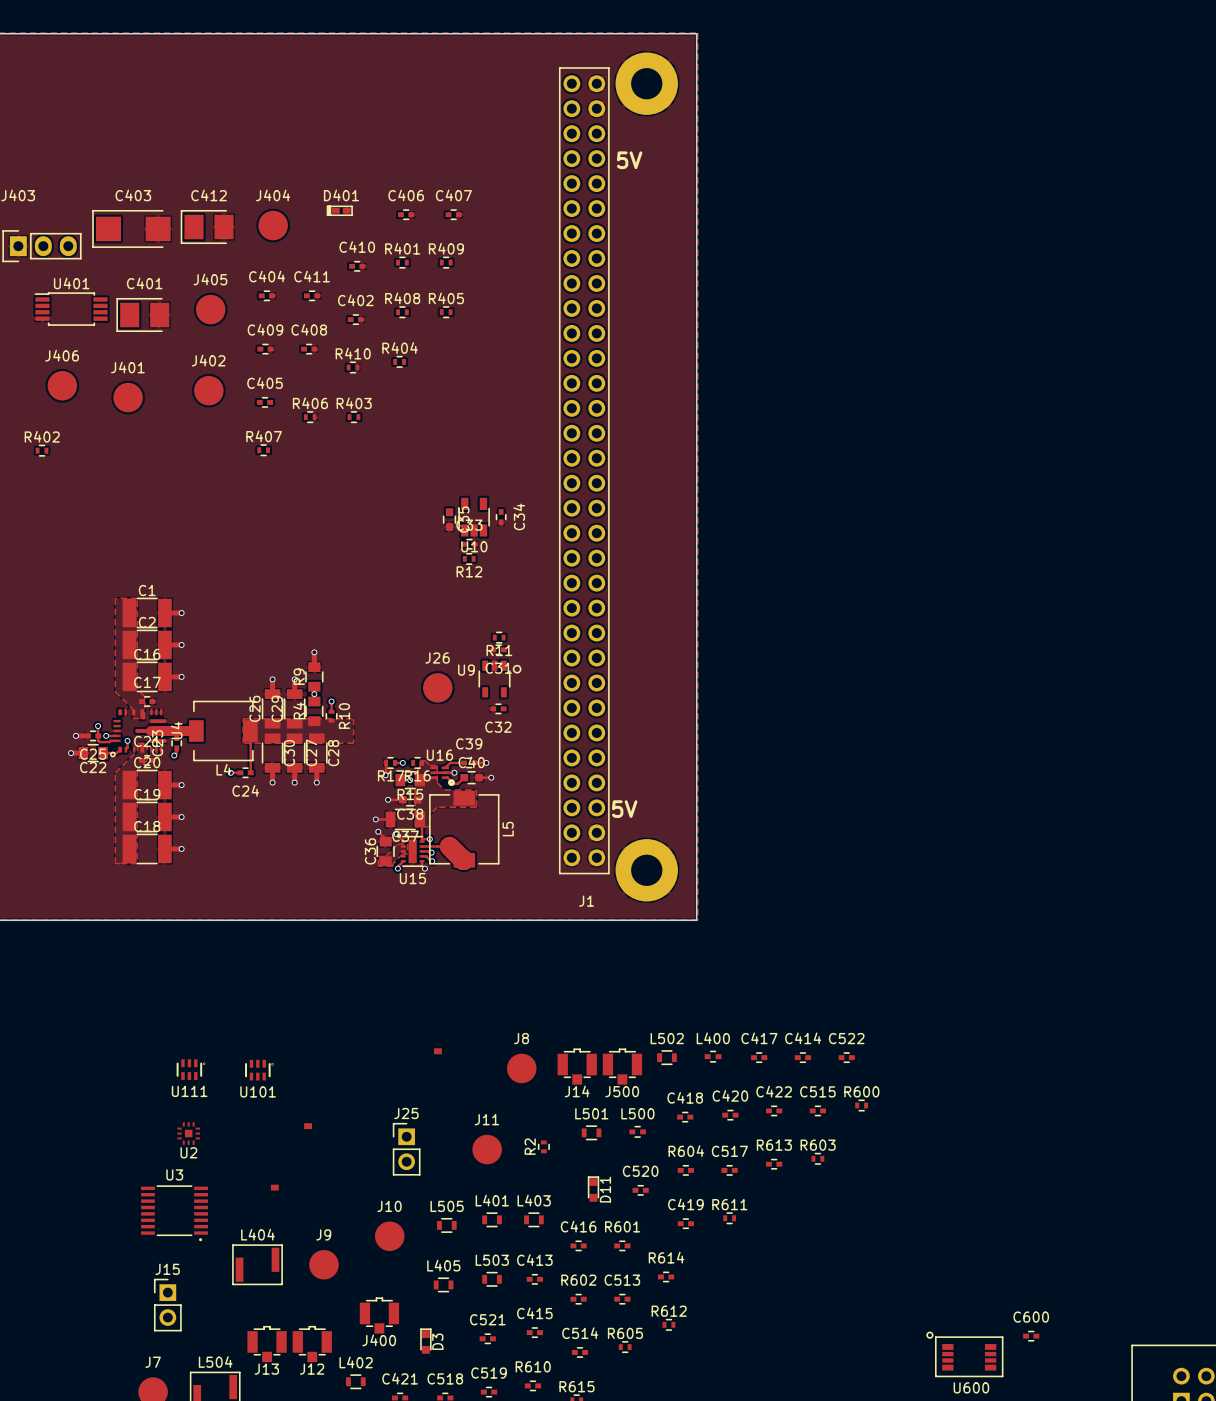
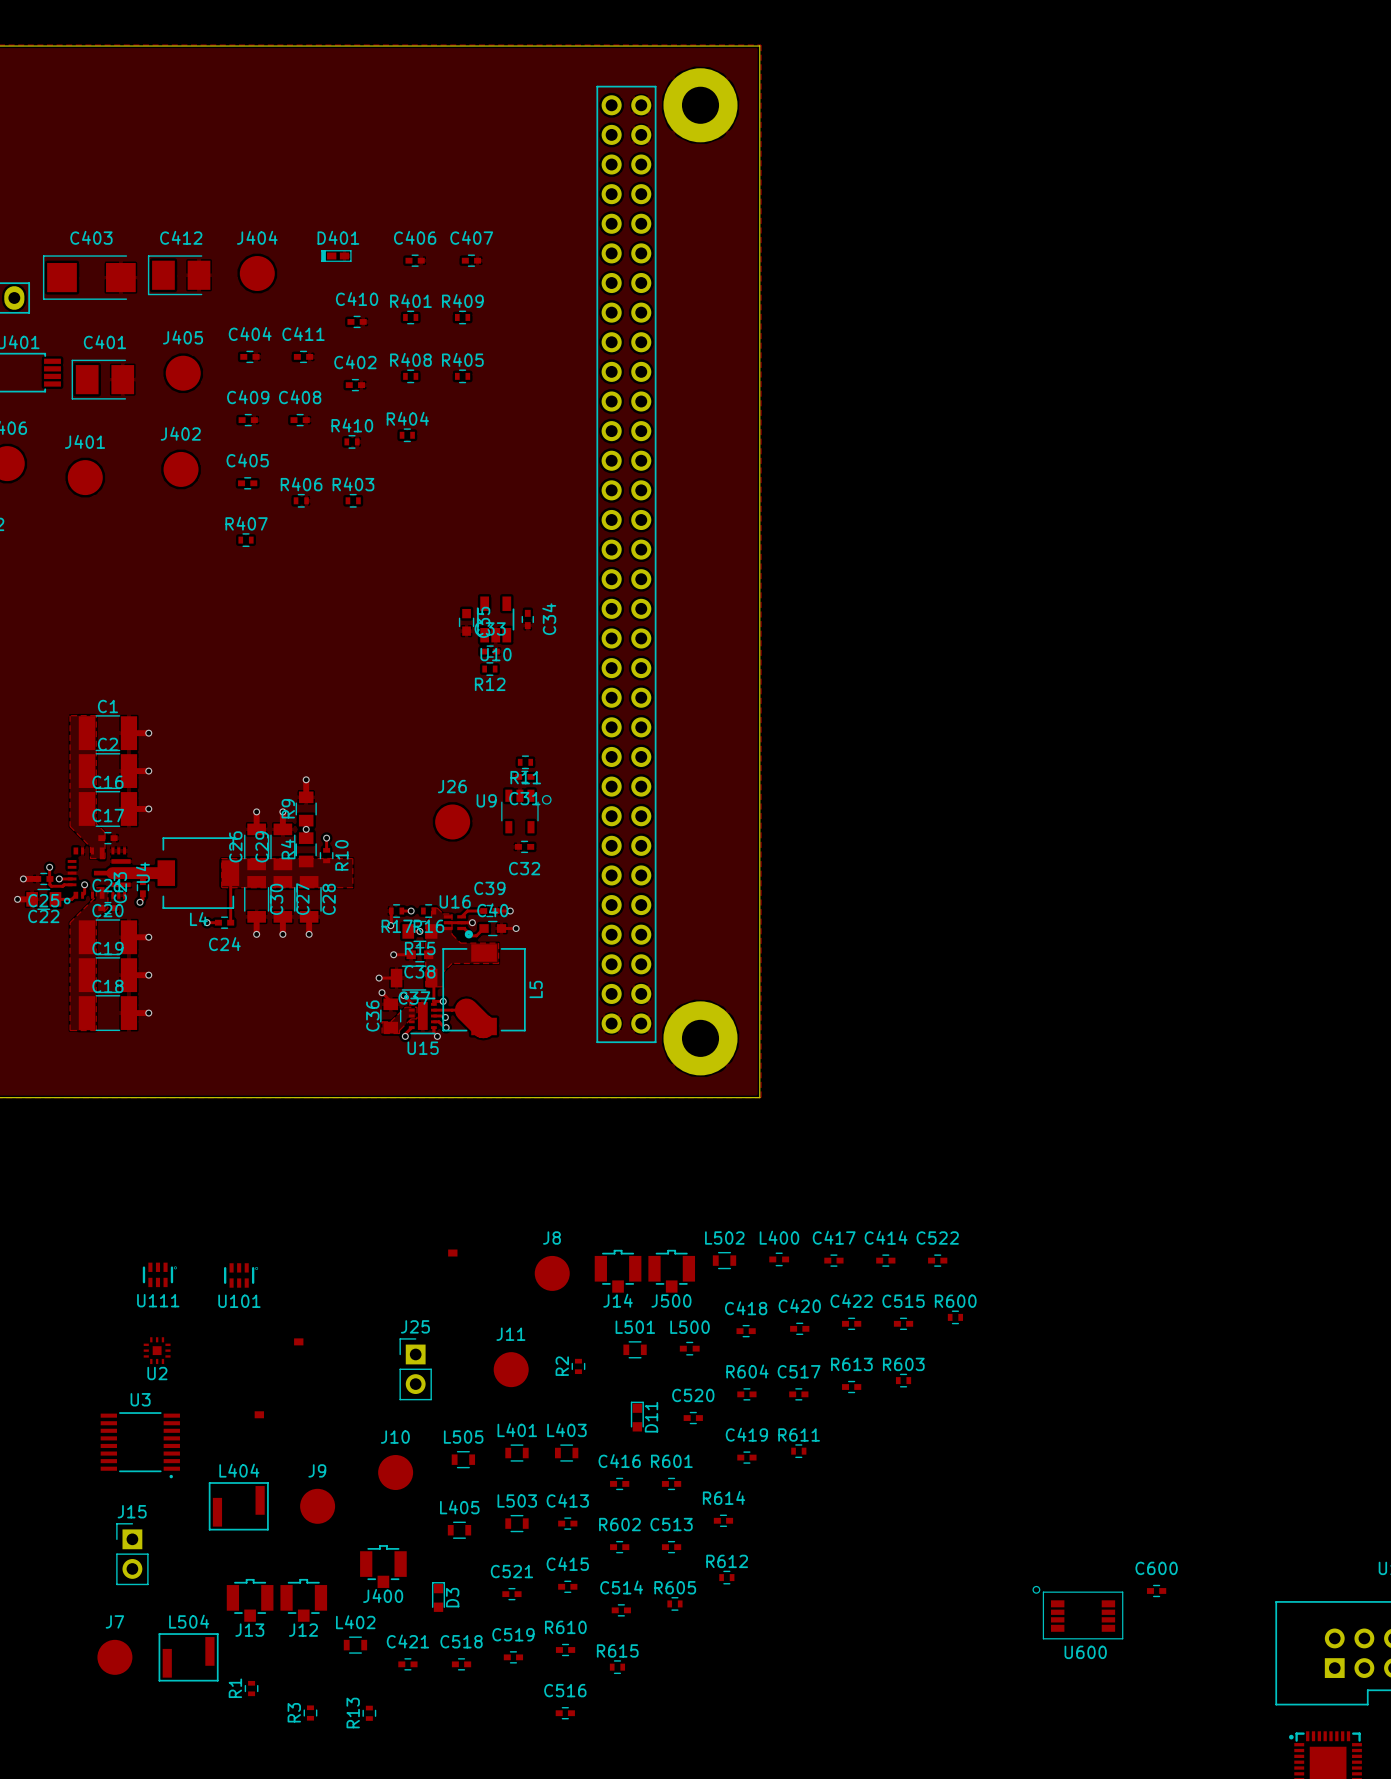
text: 5V (629, 160) -> none
text: 5V (624, 809) -> none
J1 name: J1 (586, 901) -> none

